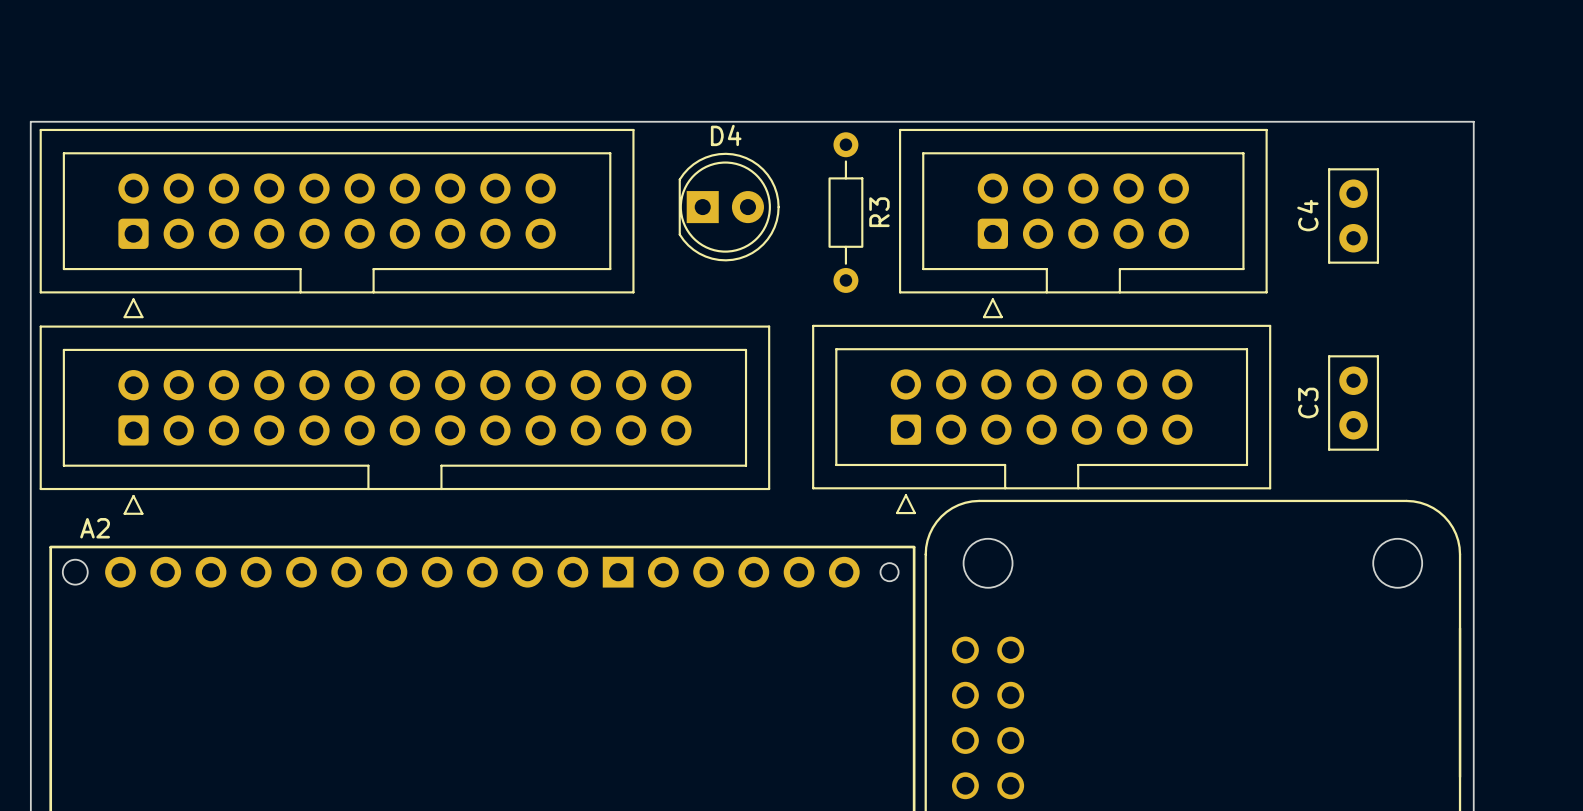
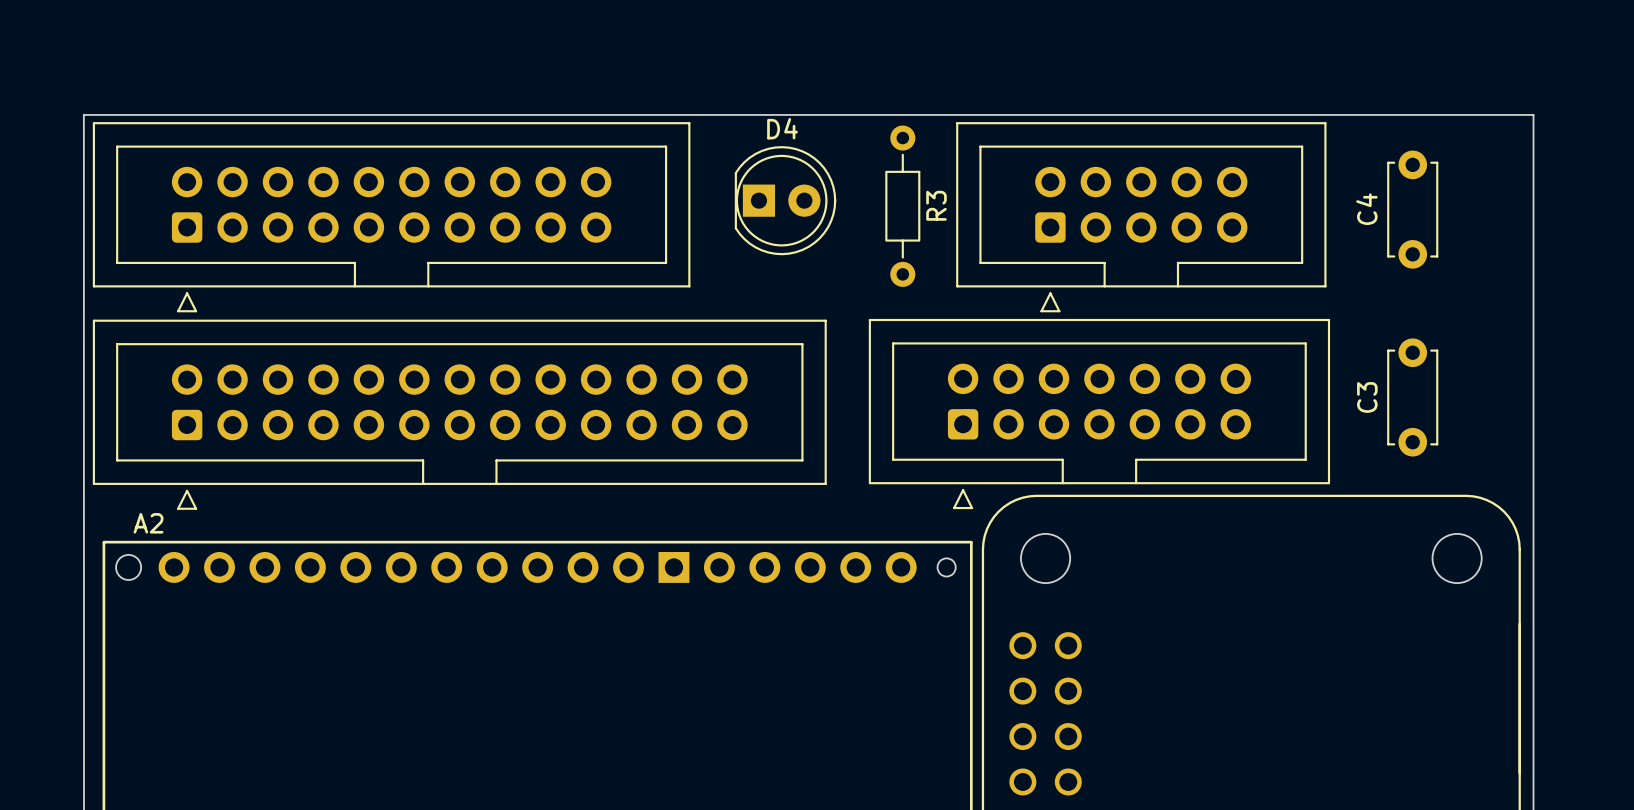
C4 footprint: [1328, 168, 1379, 264] -> [1387, 150, 1439, 269]
C3 footprint: [1328, 355, 1379, 451] -> [1387, 338, 1439, 457]

